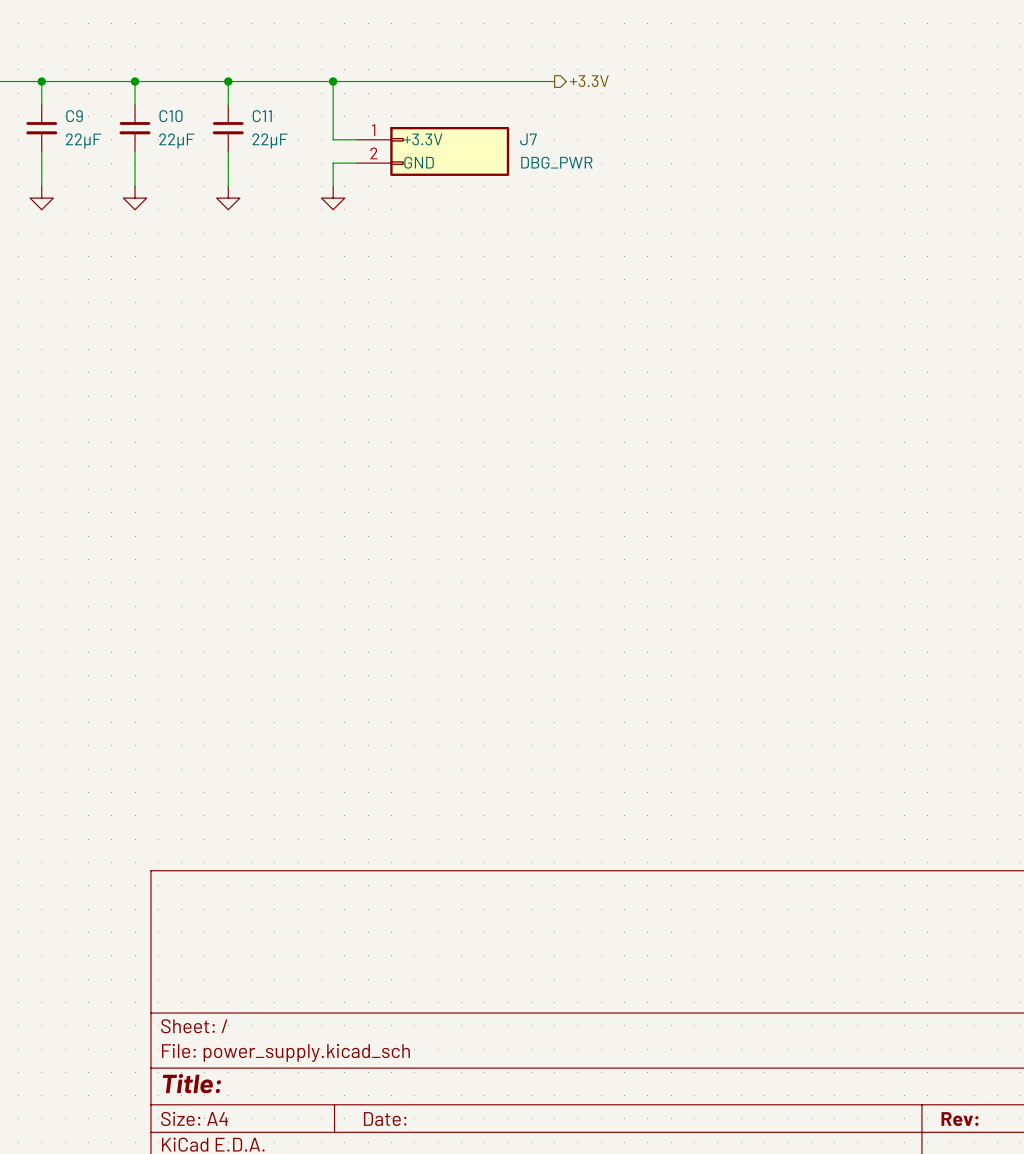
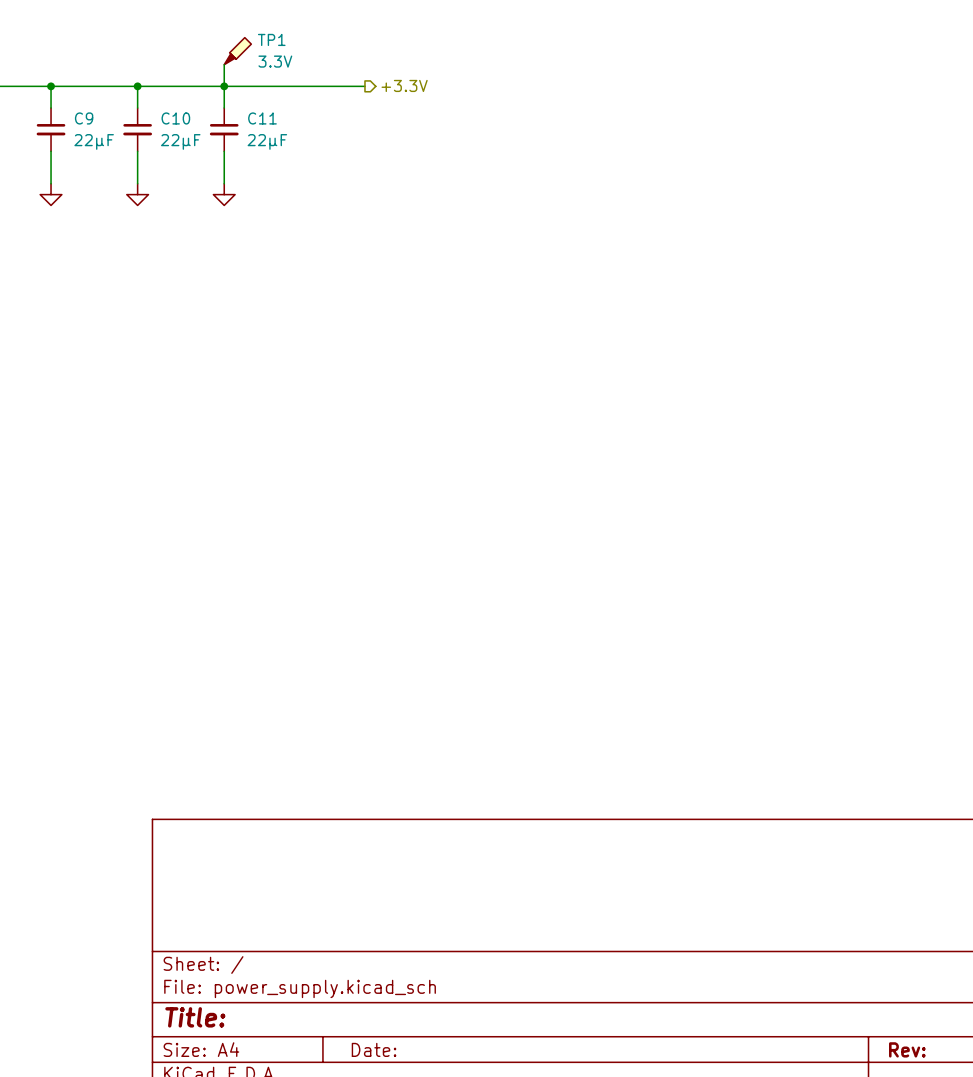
TP1: none -> 3.3V (237, 51)
wire: none -> (224, 64) (224, 86)
wire: (333, 81) (333, 139) (356, 139) -> none
junction: (333, 81) -> none
wire: (379, 81) (554, 81) -> none
hierarchical label position: +3.3V (589, 81) -> +3.3V (404, 85)
J7: (432, 151) -> none
wire: (356, 163) (333, 163) (333, 186) -> none
power symbol: (333, 198) -> none

